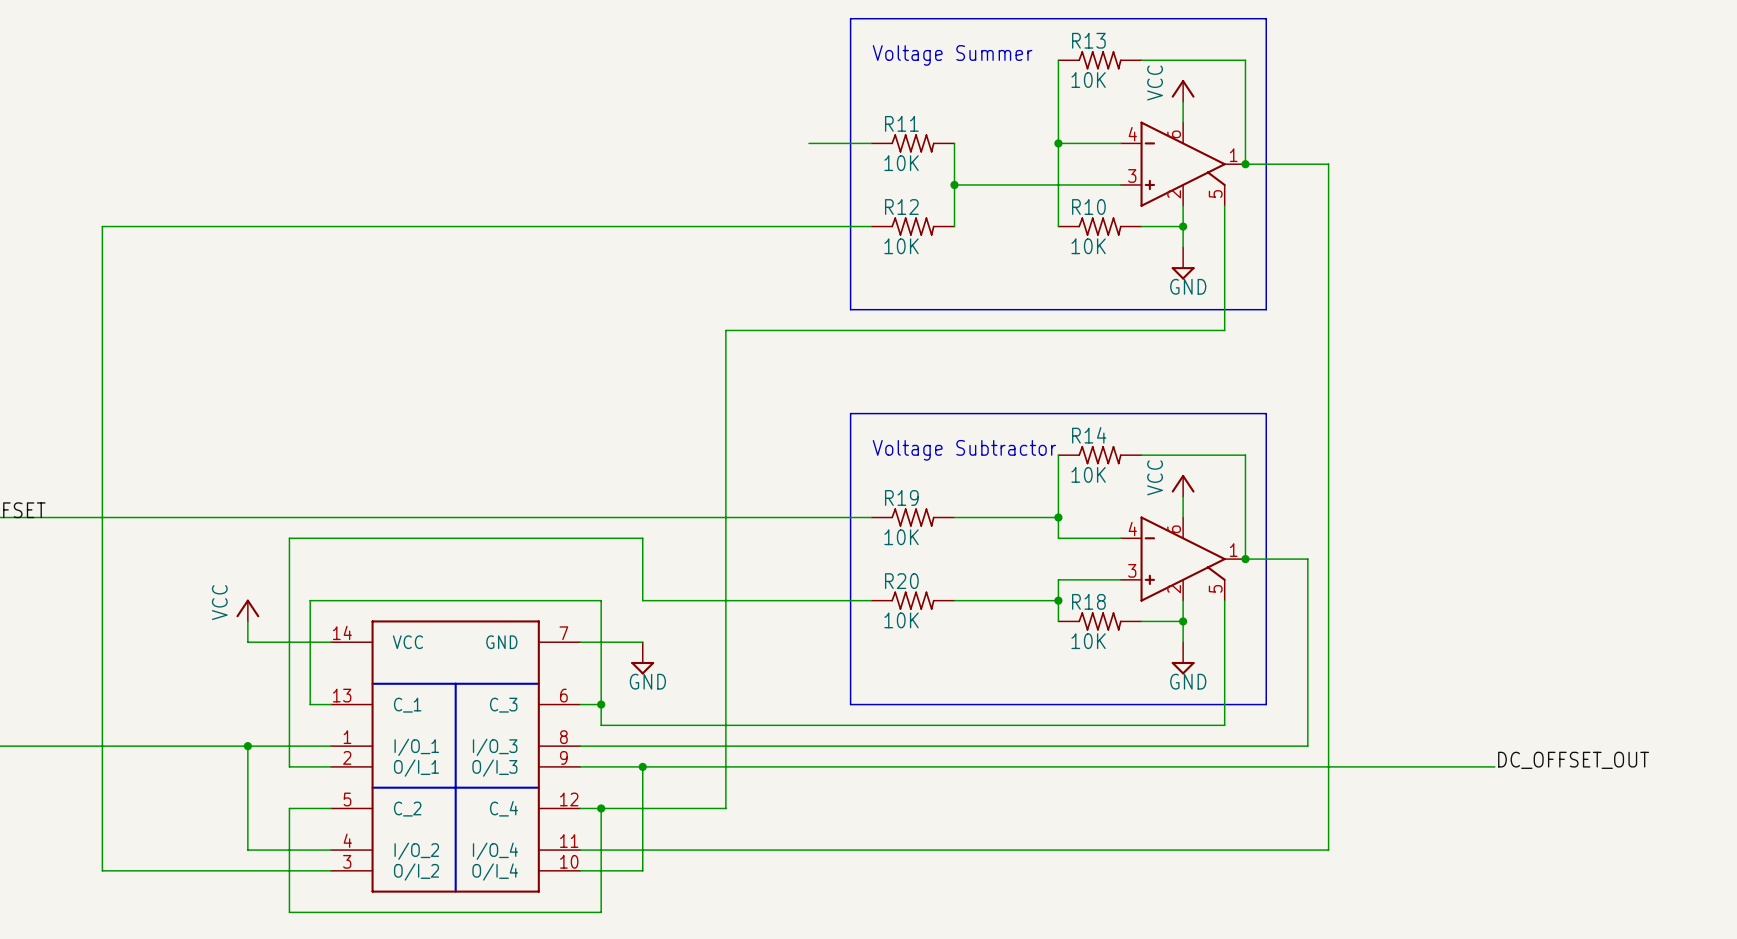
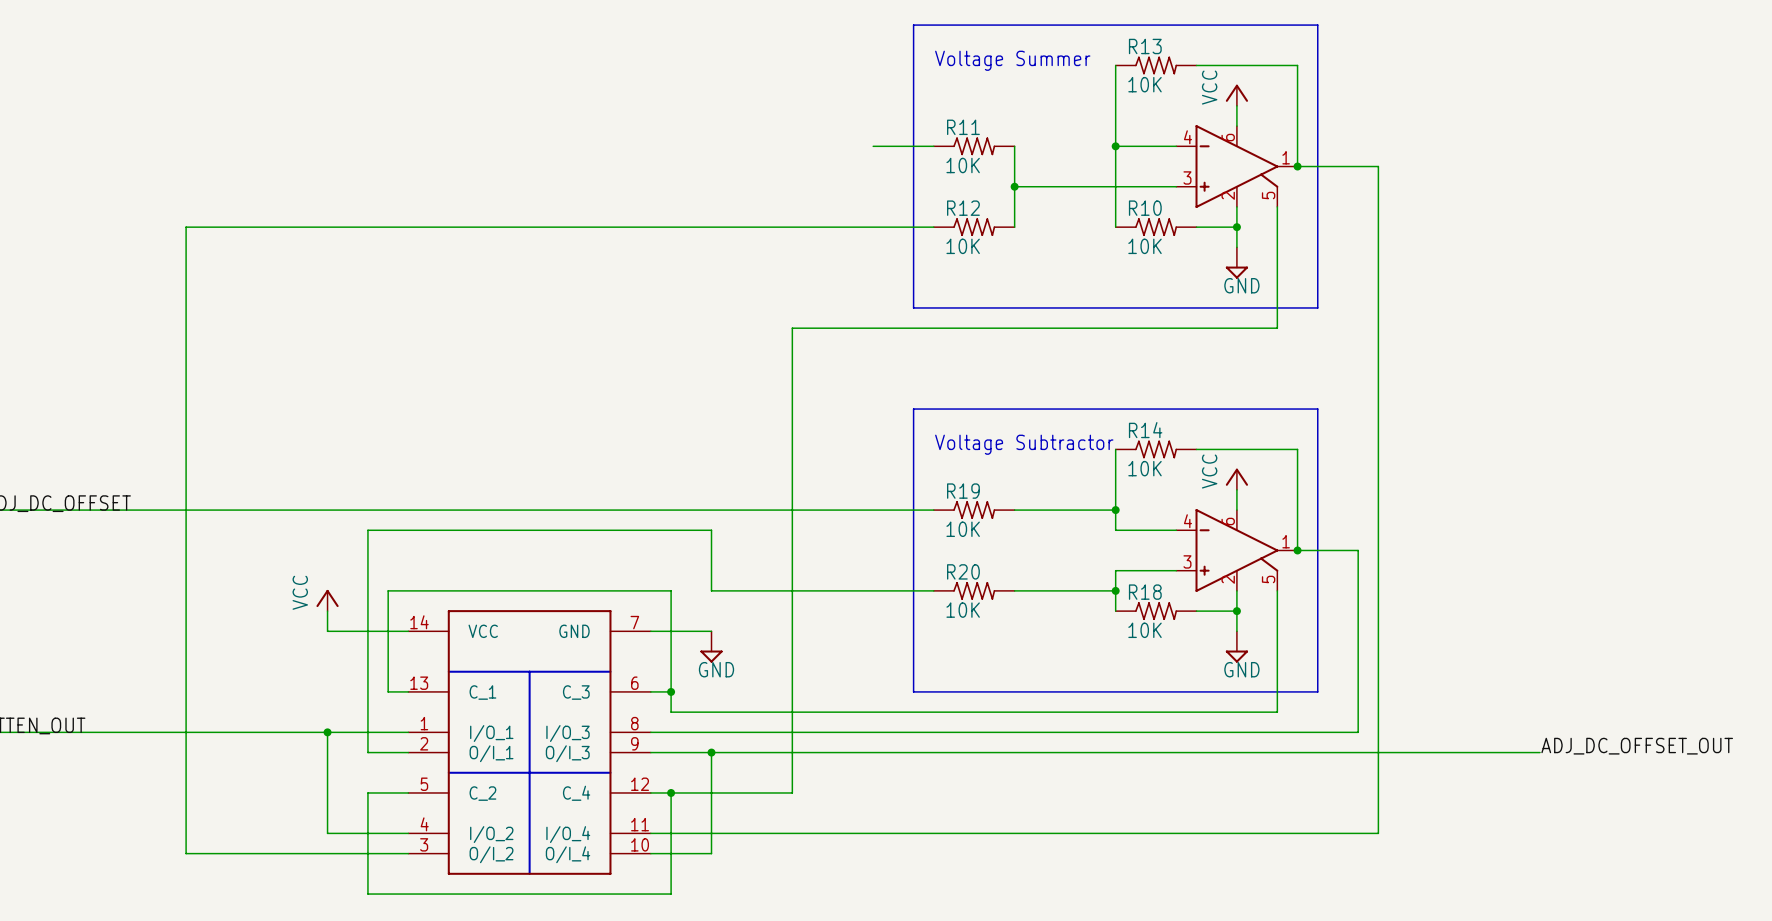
label: DC_OFFSET_OUT (1573, 760) -> ADJ_DC_OFFSET_OUT (1637, 746)

